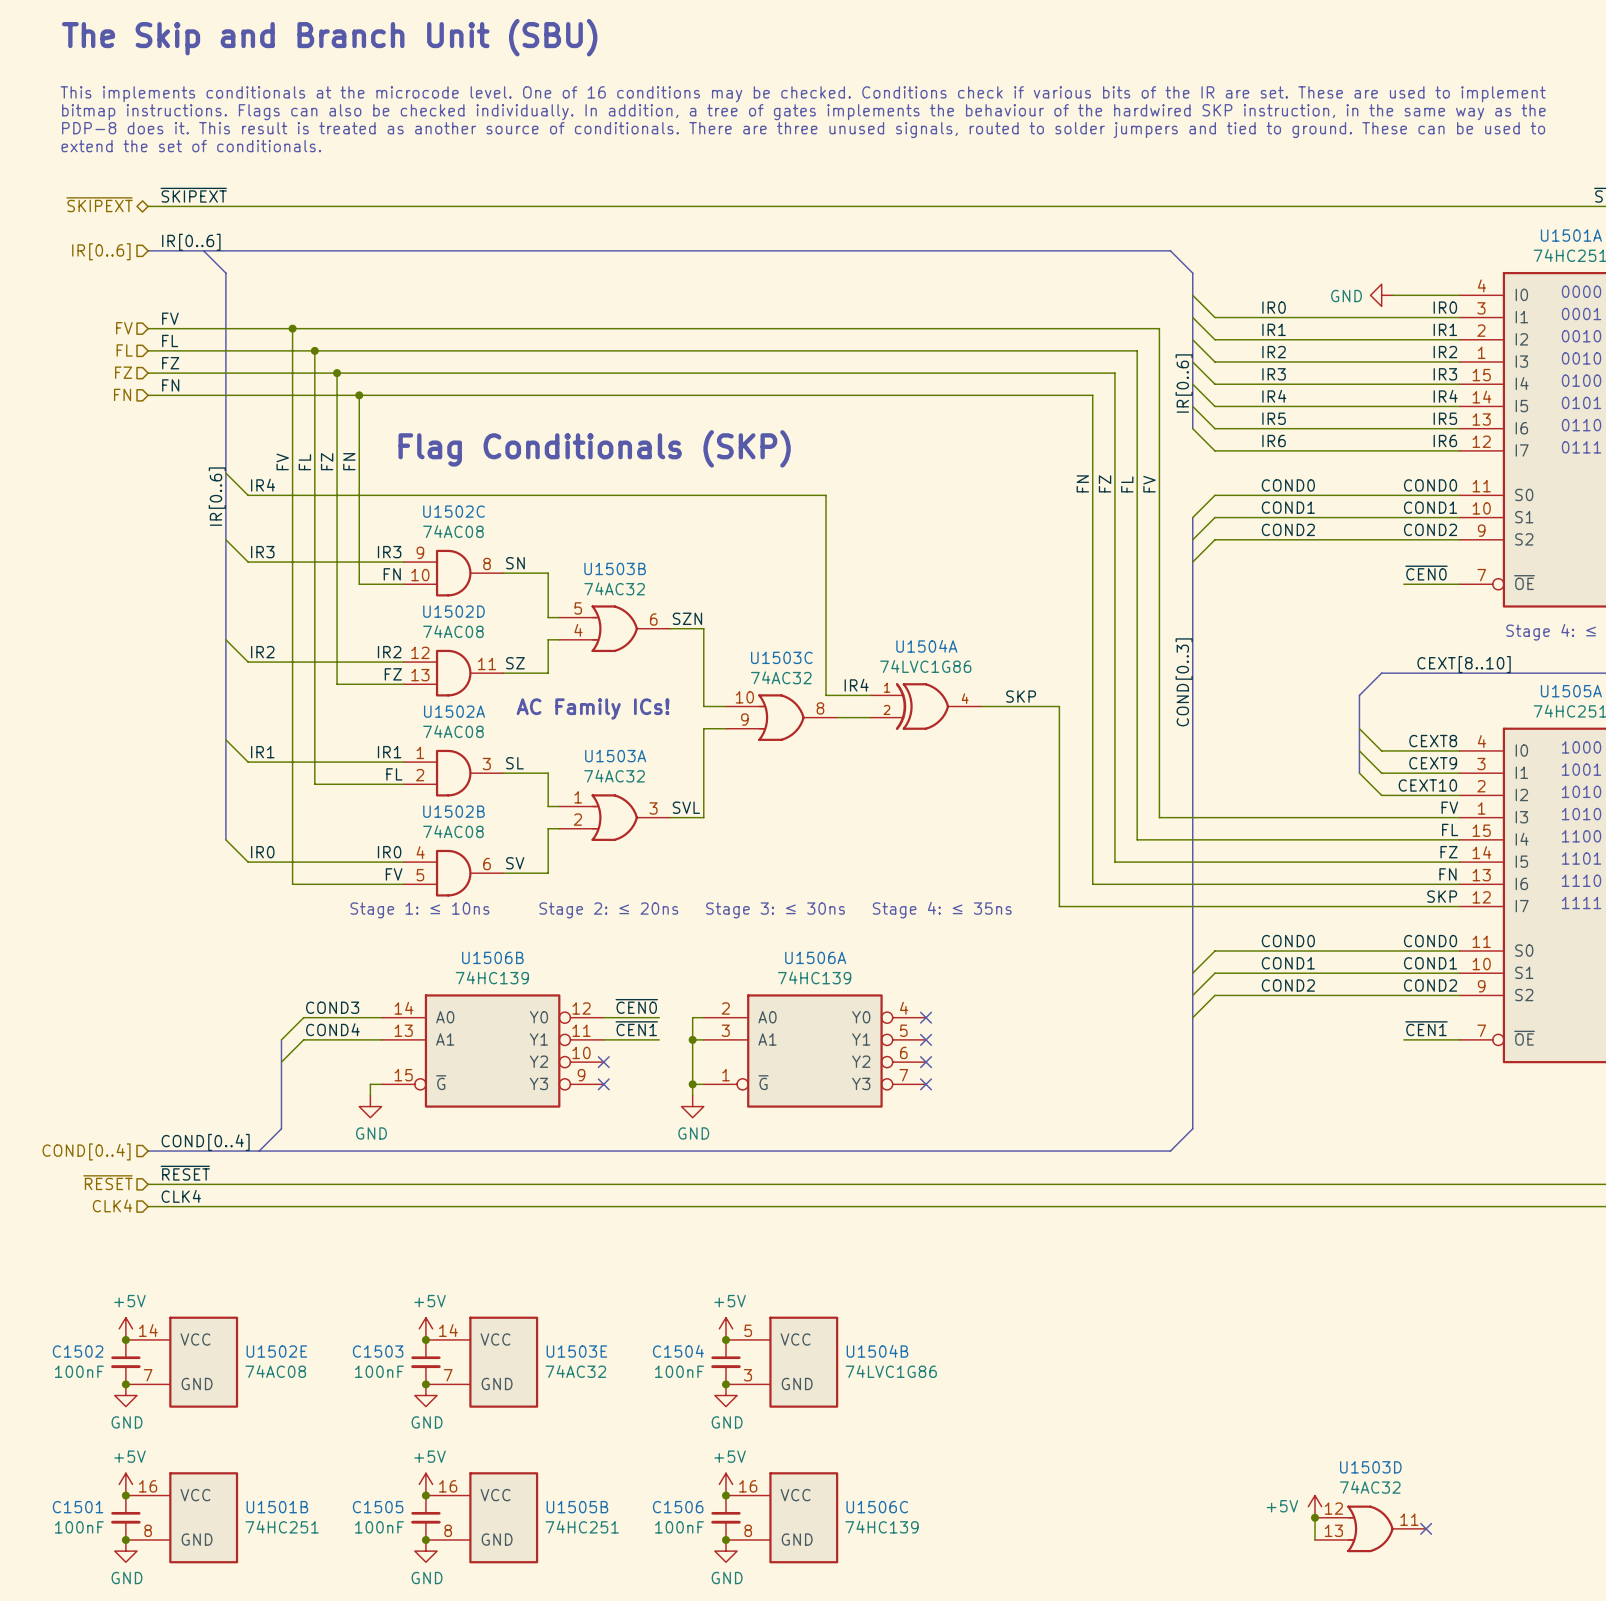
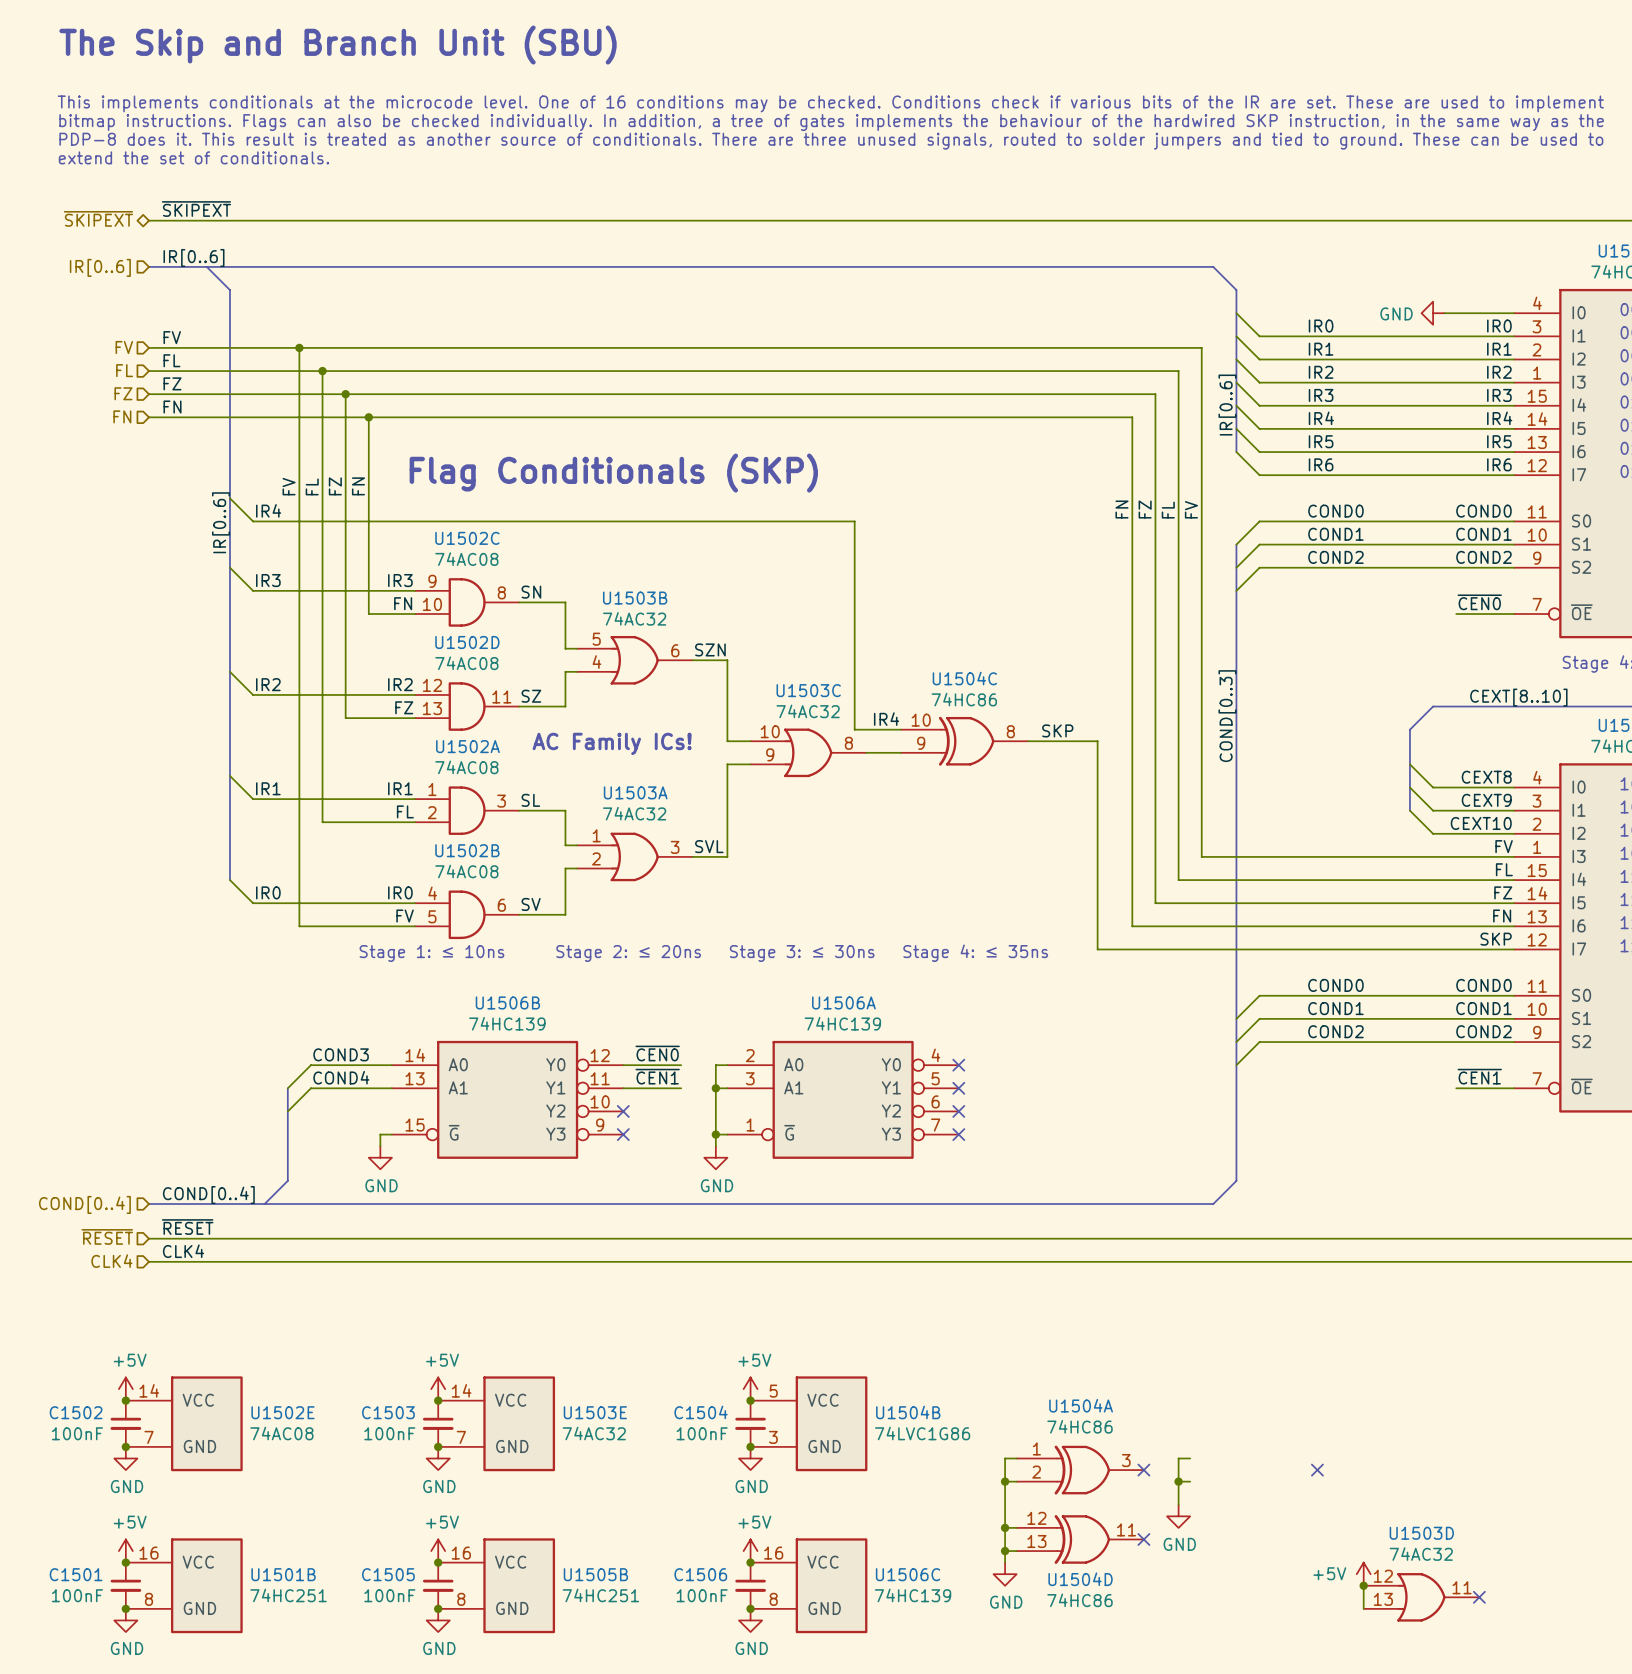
U1504A value: 74LVC1G86 (925, 666) -> 74HC86 (1079, 1426)
U1504A symbol: [870, 682, 982, 731] -> [1016, 1445, 1144, 1495]
U1504C: none -> 74HC86 (964, 741)
wire: none -> (1016, 1458) (1005, 1458) (1005, 1562)
wire: none -> (1190, 1458) (1178, 1458) (1178, 1504)
no-connect mark: none -> (1143, 1470)
no-connect mark: none -> (1317, 1470)
wire: none -> (1005, 1481) (1016, 1481)
junction: none -> (1005, 1481)
wire: none -> (1178, 1481) (1190, 1481)
junction: none -> (1178, 1481)
power symbol: none -> GND (1178, 1516)
wire: none -> (1005, 1527) (1016, 1527)
junction: none -> (1005, 1527)
U1504D: none -> 74HC86 (1080, 1539)
no-connect mark: none -> (1143, 1539)
wire: none -> (1005, 1551) (1016, 1551)
junction: none -> (1005, 1551)
power symbol: none -> GND (1005, 1574)

